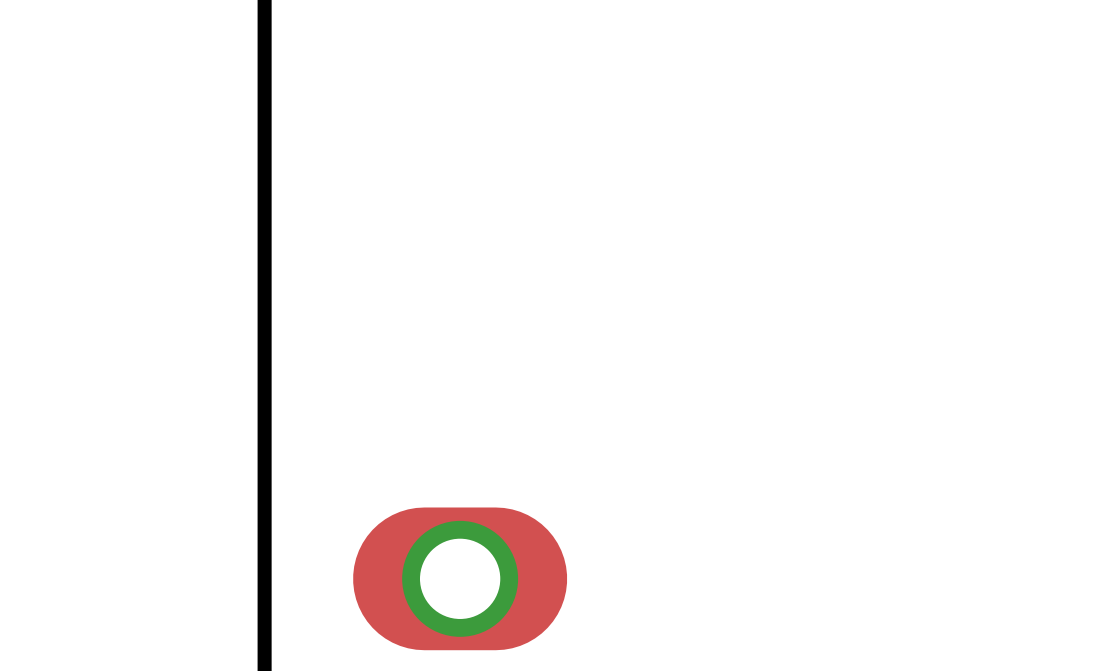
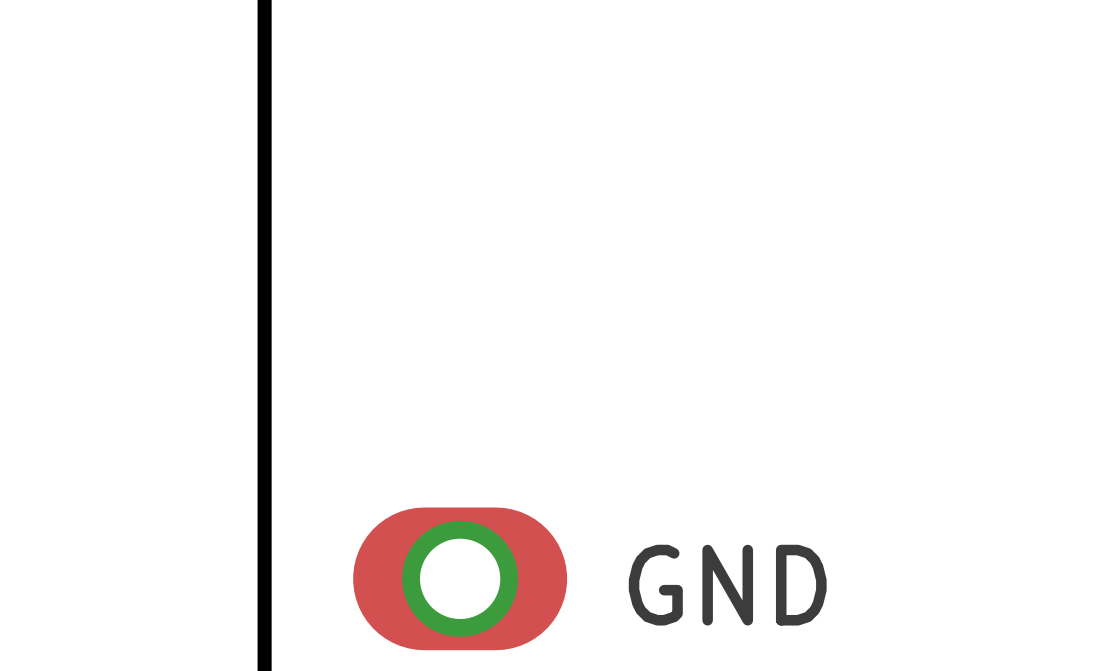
text: none -> GND (727, 585)

